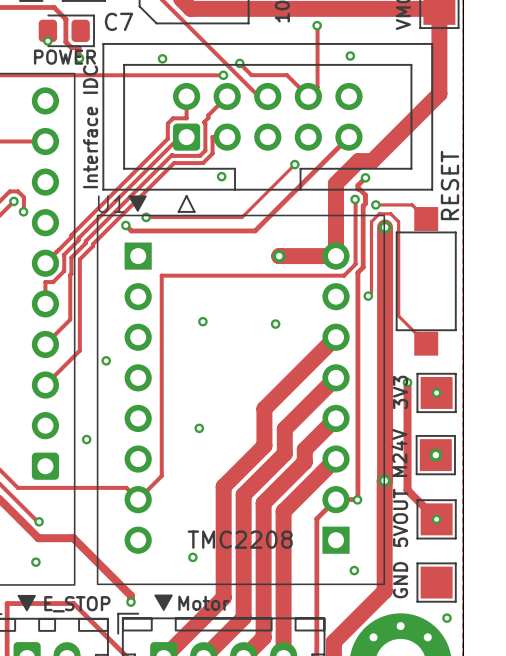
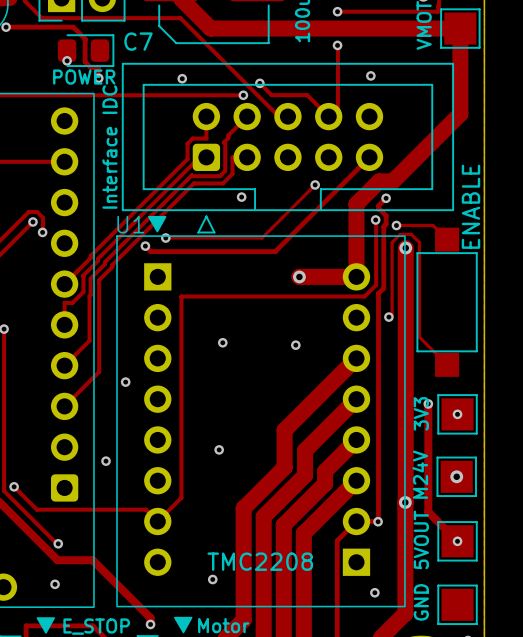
part value: RESET (449, 185) -> ENABLE (470, 206)

